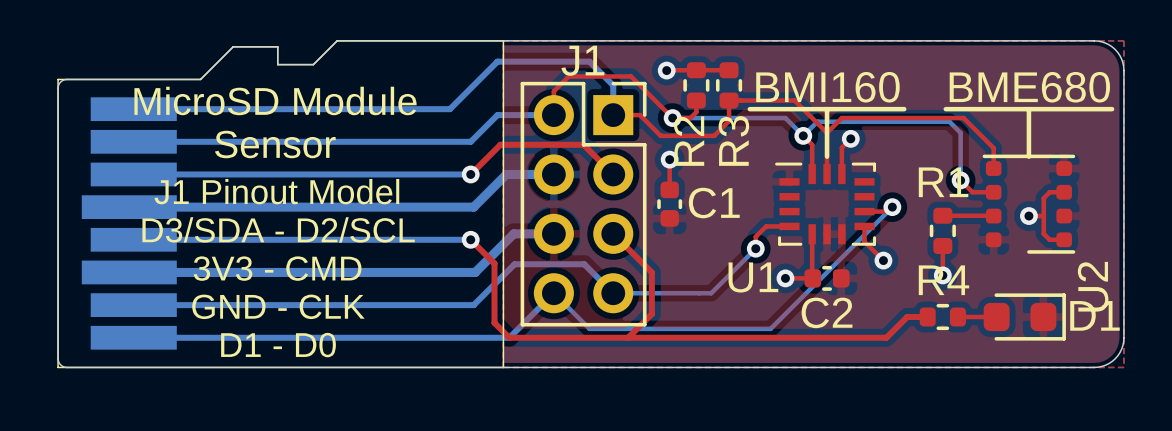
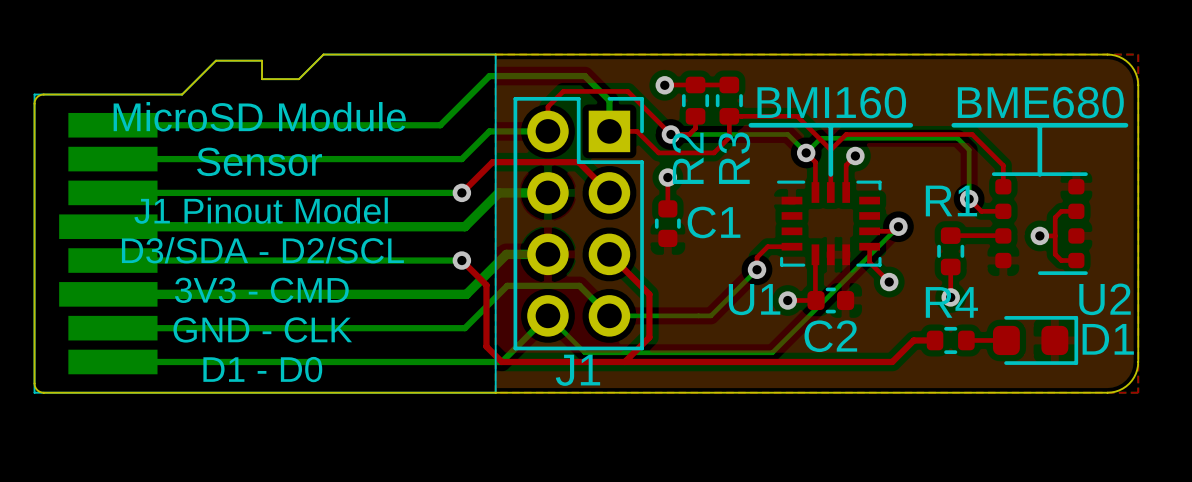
J1 name position: J1 (582, 60) -> J1 (577, 370)
U2 name rotation: 0° (1093, 286) -> 90° clockwise (1105, 299)

